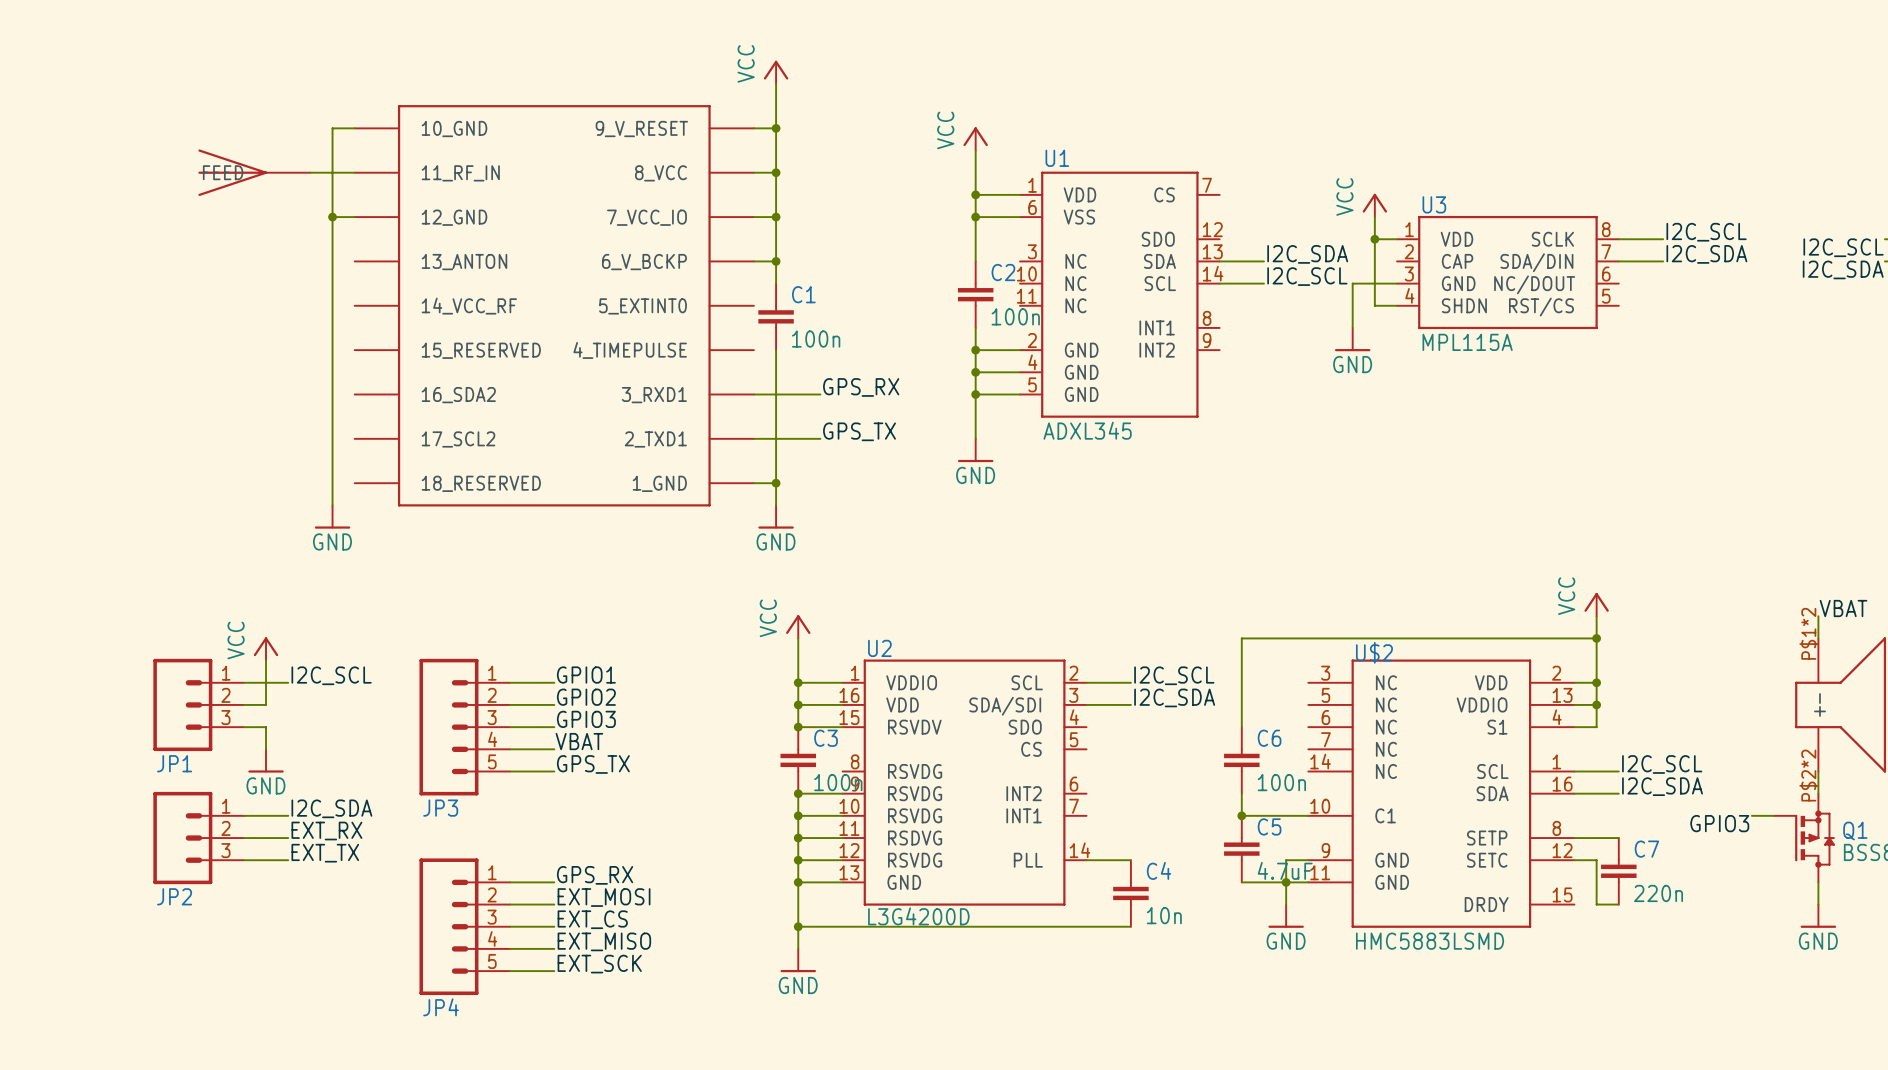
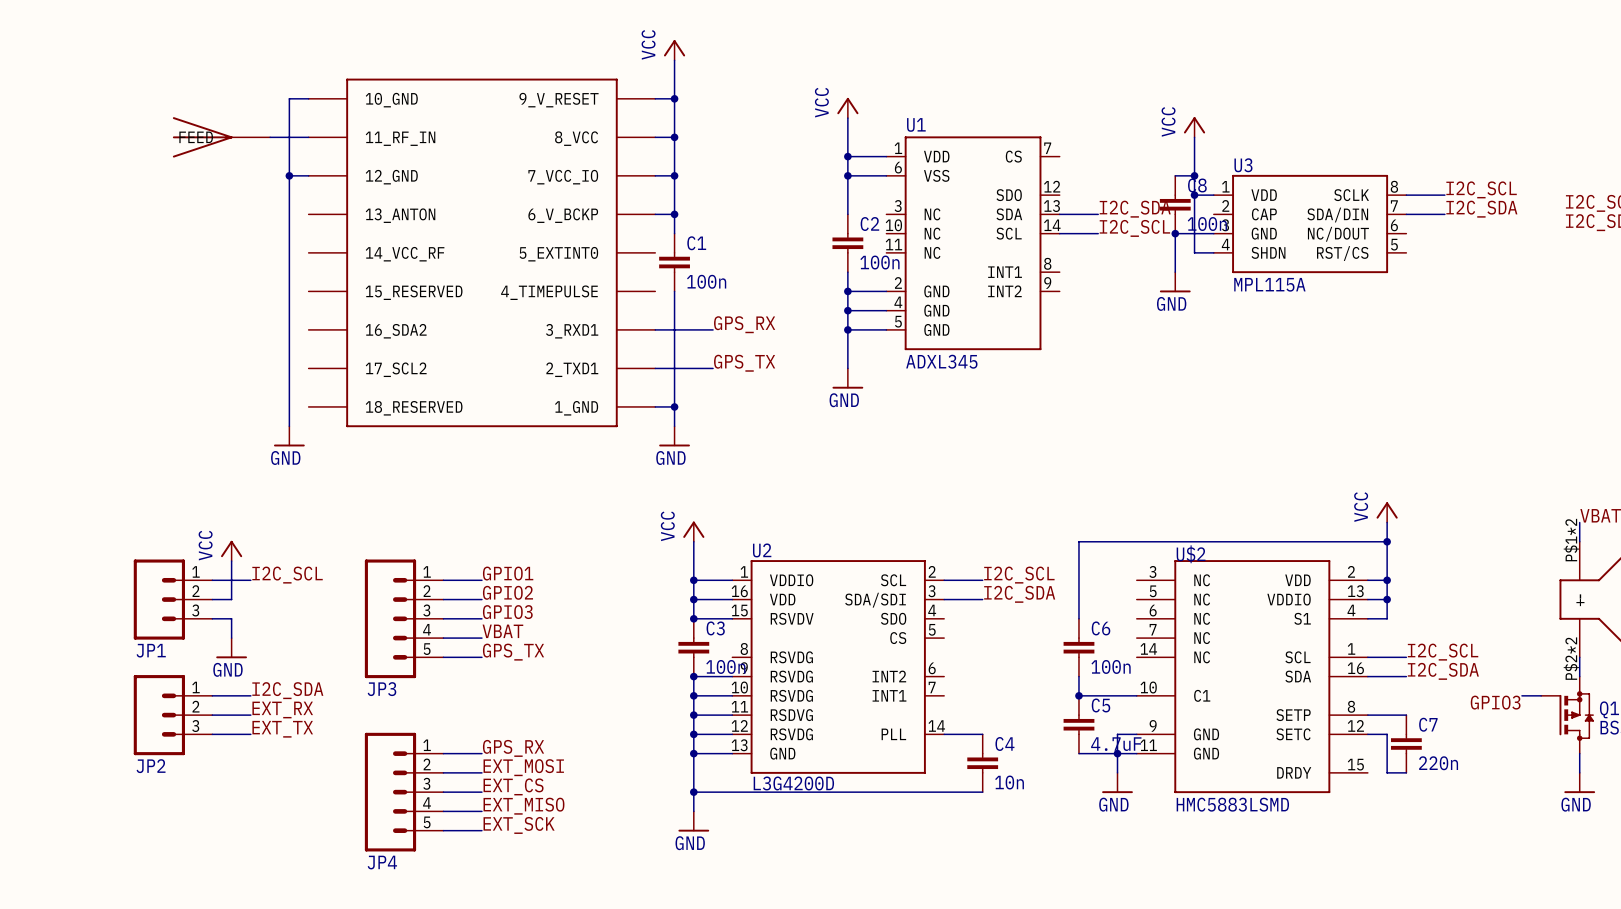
wire: none -> (1194, 137) (1194, 175) (1175, 175)
power symbol position: VCC (1374, 205) -> VCC (1194, 127)
junction: none -> (1194, 175)
C8: none -> 100n (1175, 204)
junction: none -> (1175, 233)

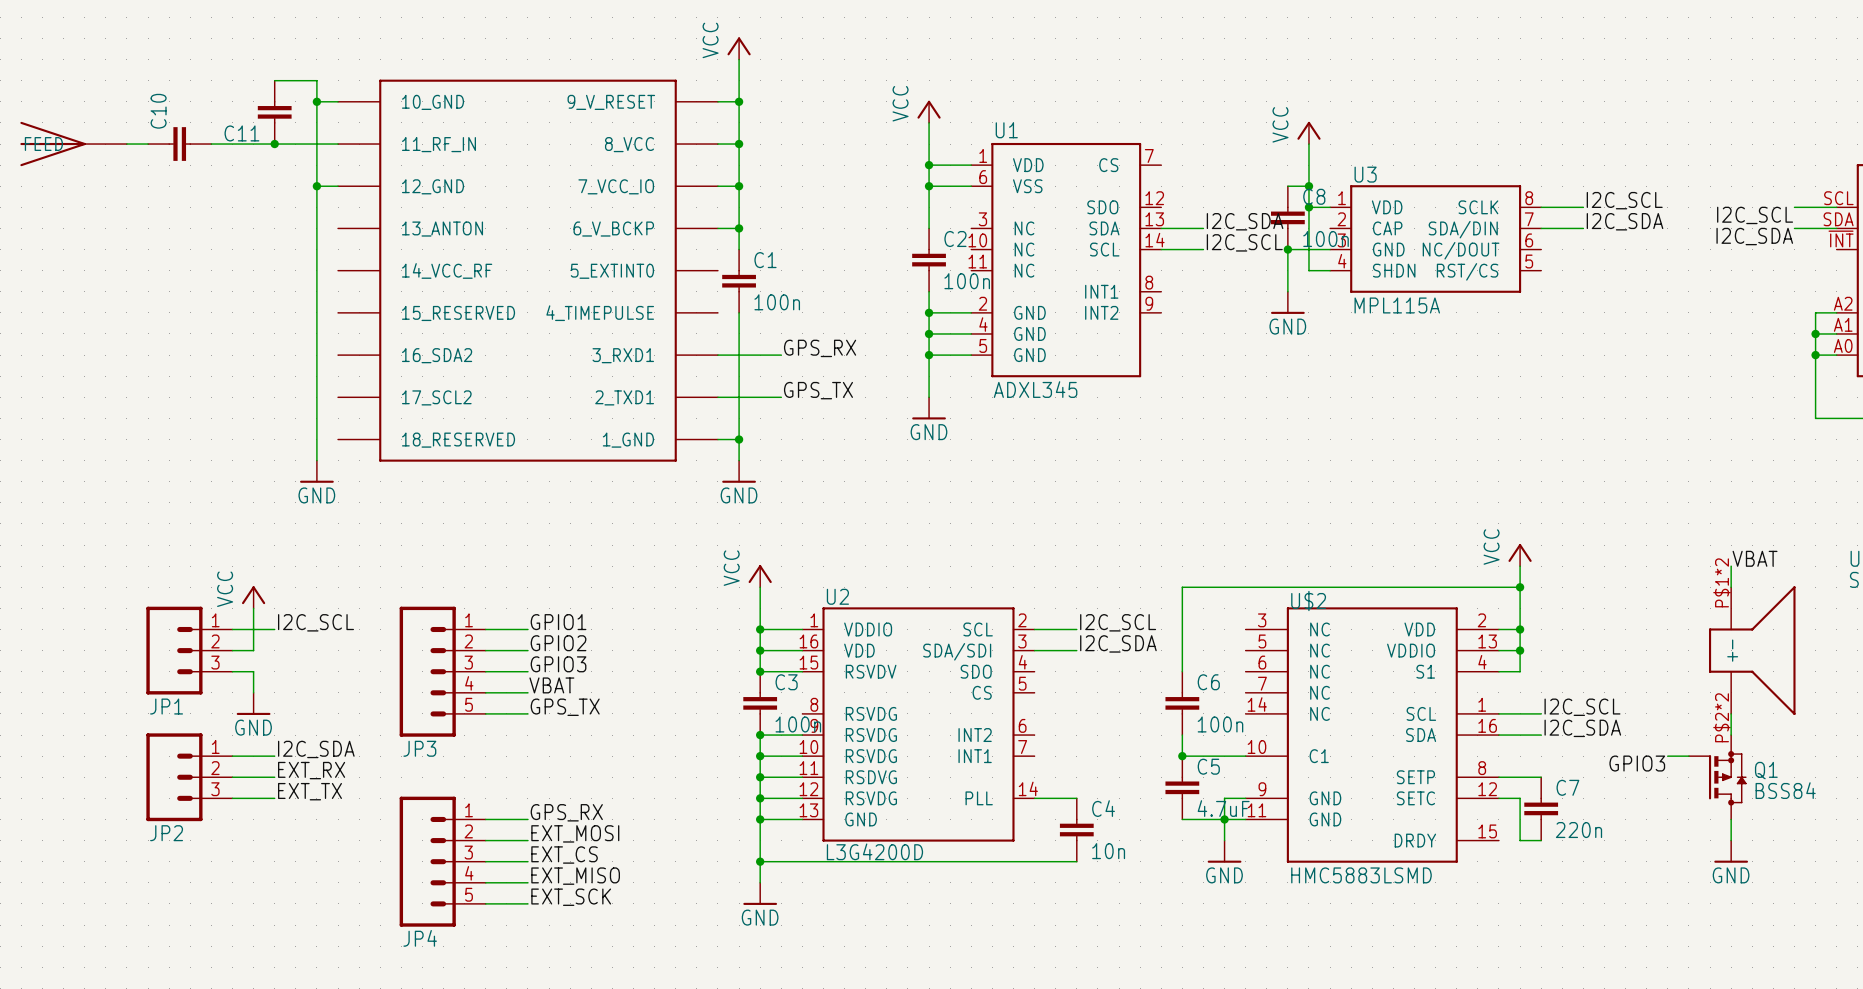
wire: none -> (274, 80) (316, 80) (316, 101)
junction: none -> (316, 101)
C11: none -> (274, 112)
wire: none -> (126, 144) (148, 144)
C10: none -> (179, 144)
part position: (221, 137) -> (73, 144)
junction: none -> (274, 144)

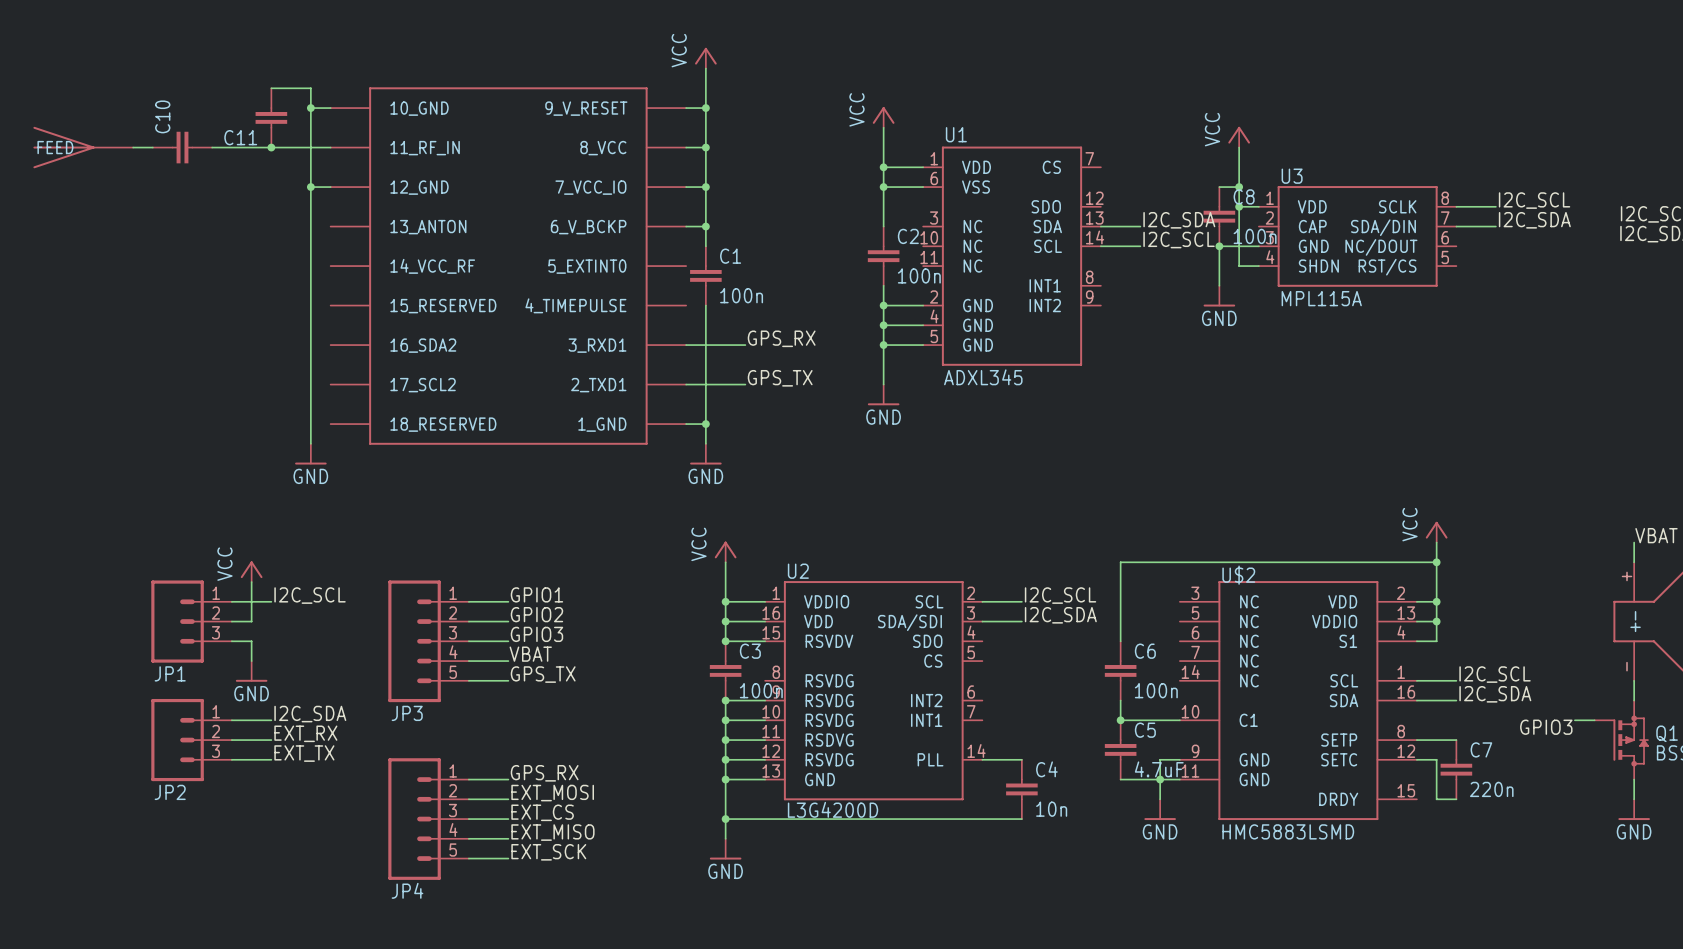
part pin number: P$1*2 (1722, 582) -> + (1627, 576)
part pin number: P$2*2 (1722, 717) -> - (1627, 666)

